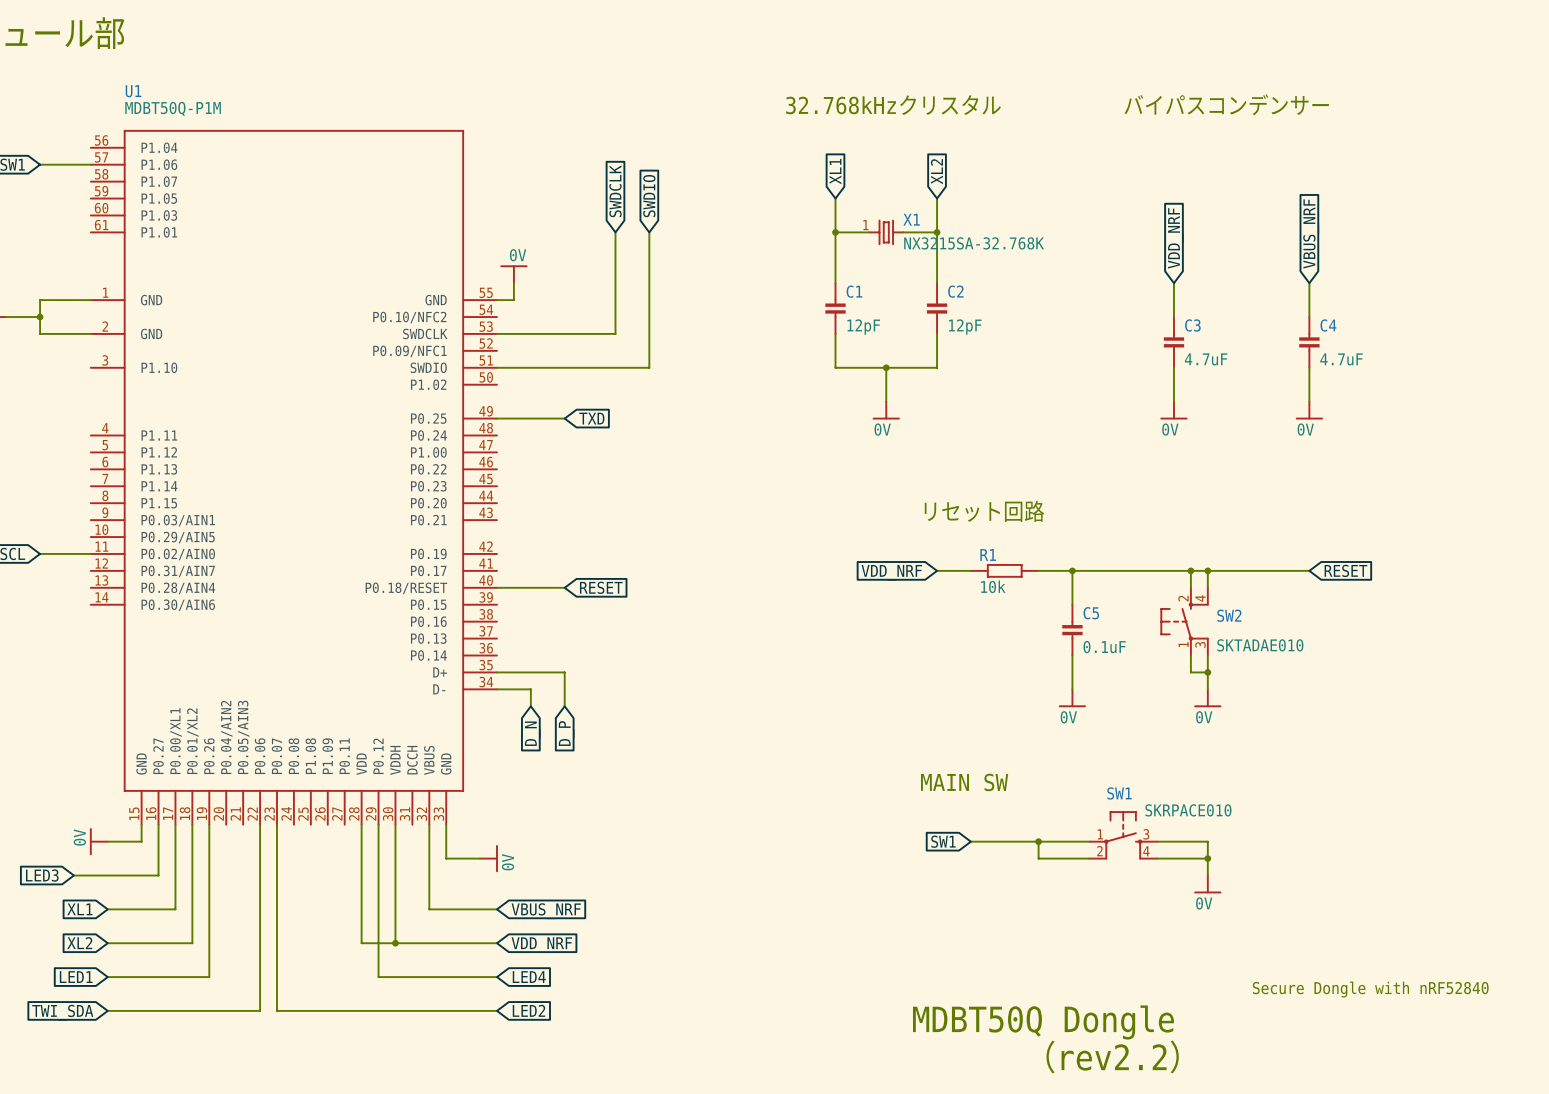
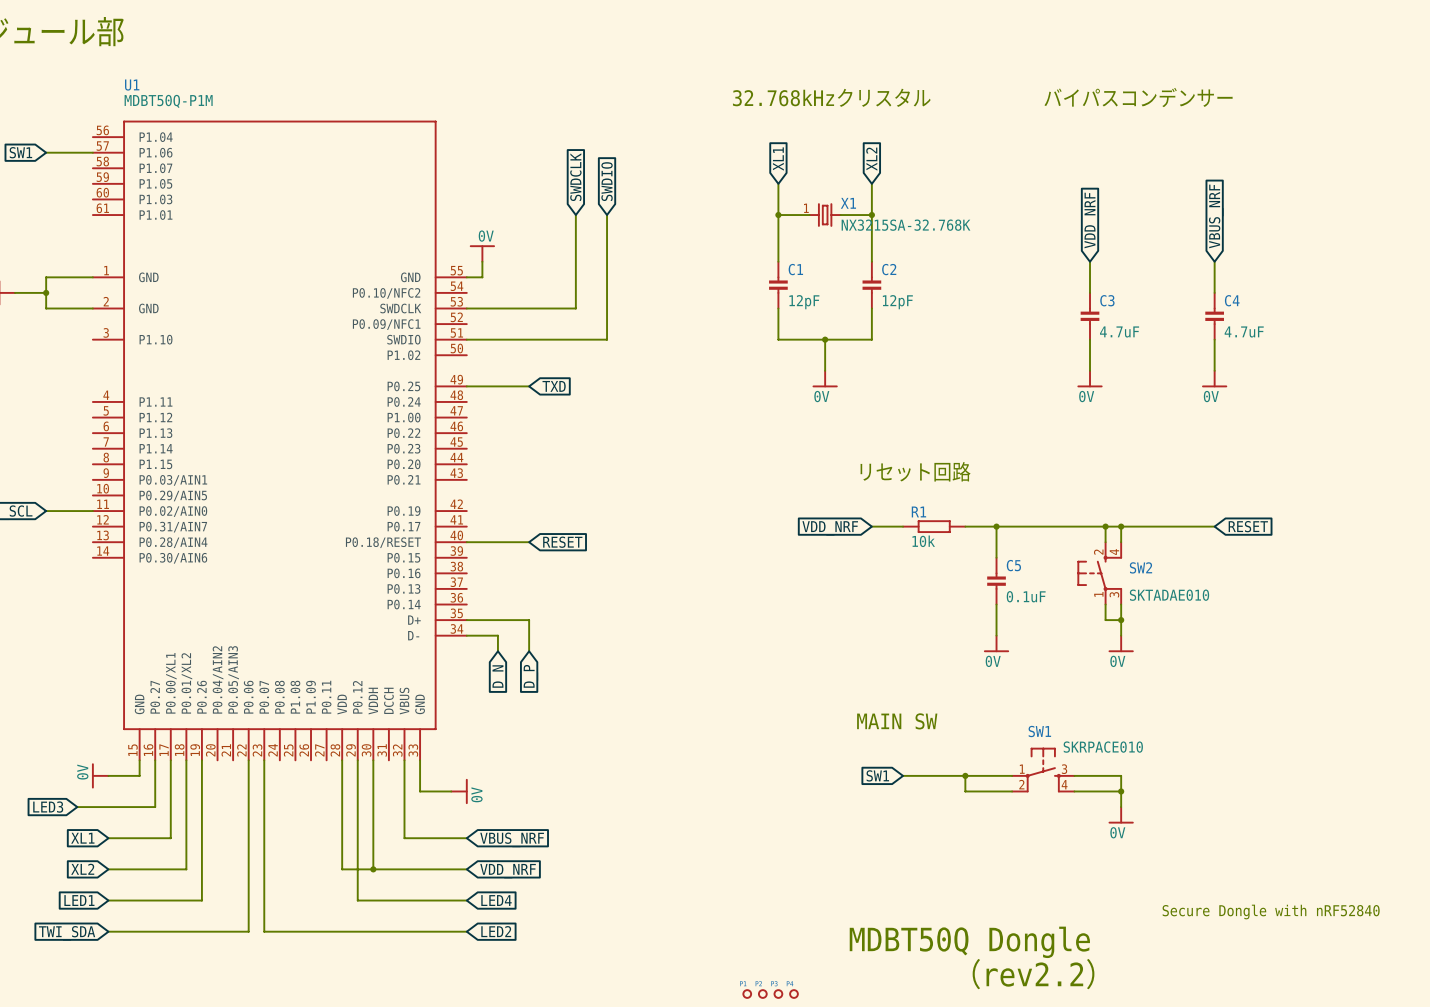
part: none -> (747, 994)
part: none -> (762, 994)
part: none -> (778, 994)
part: none -> (793, 994)

